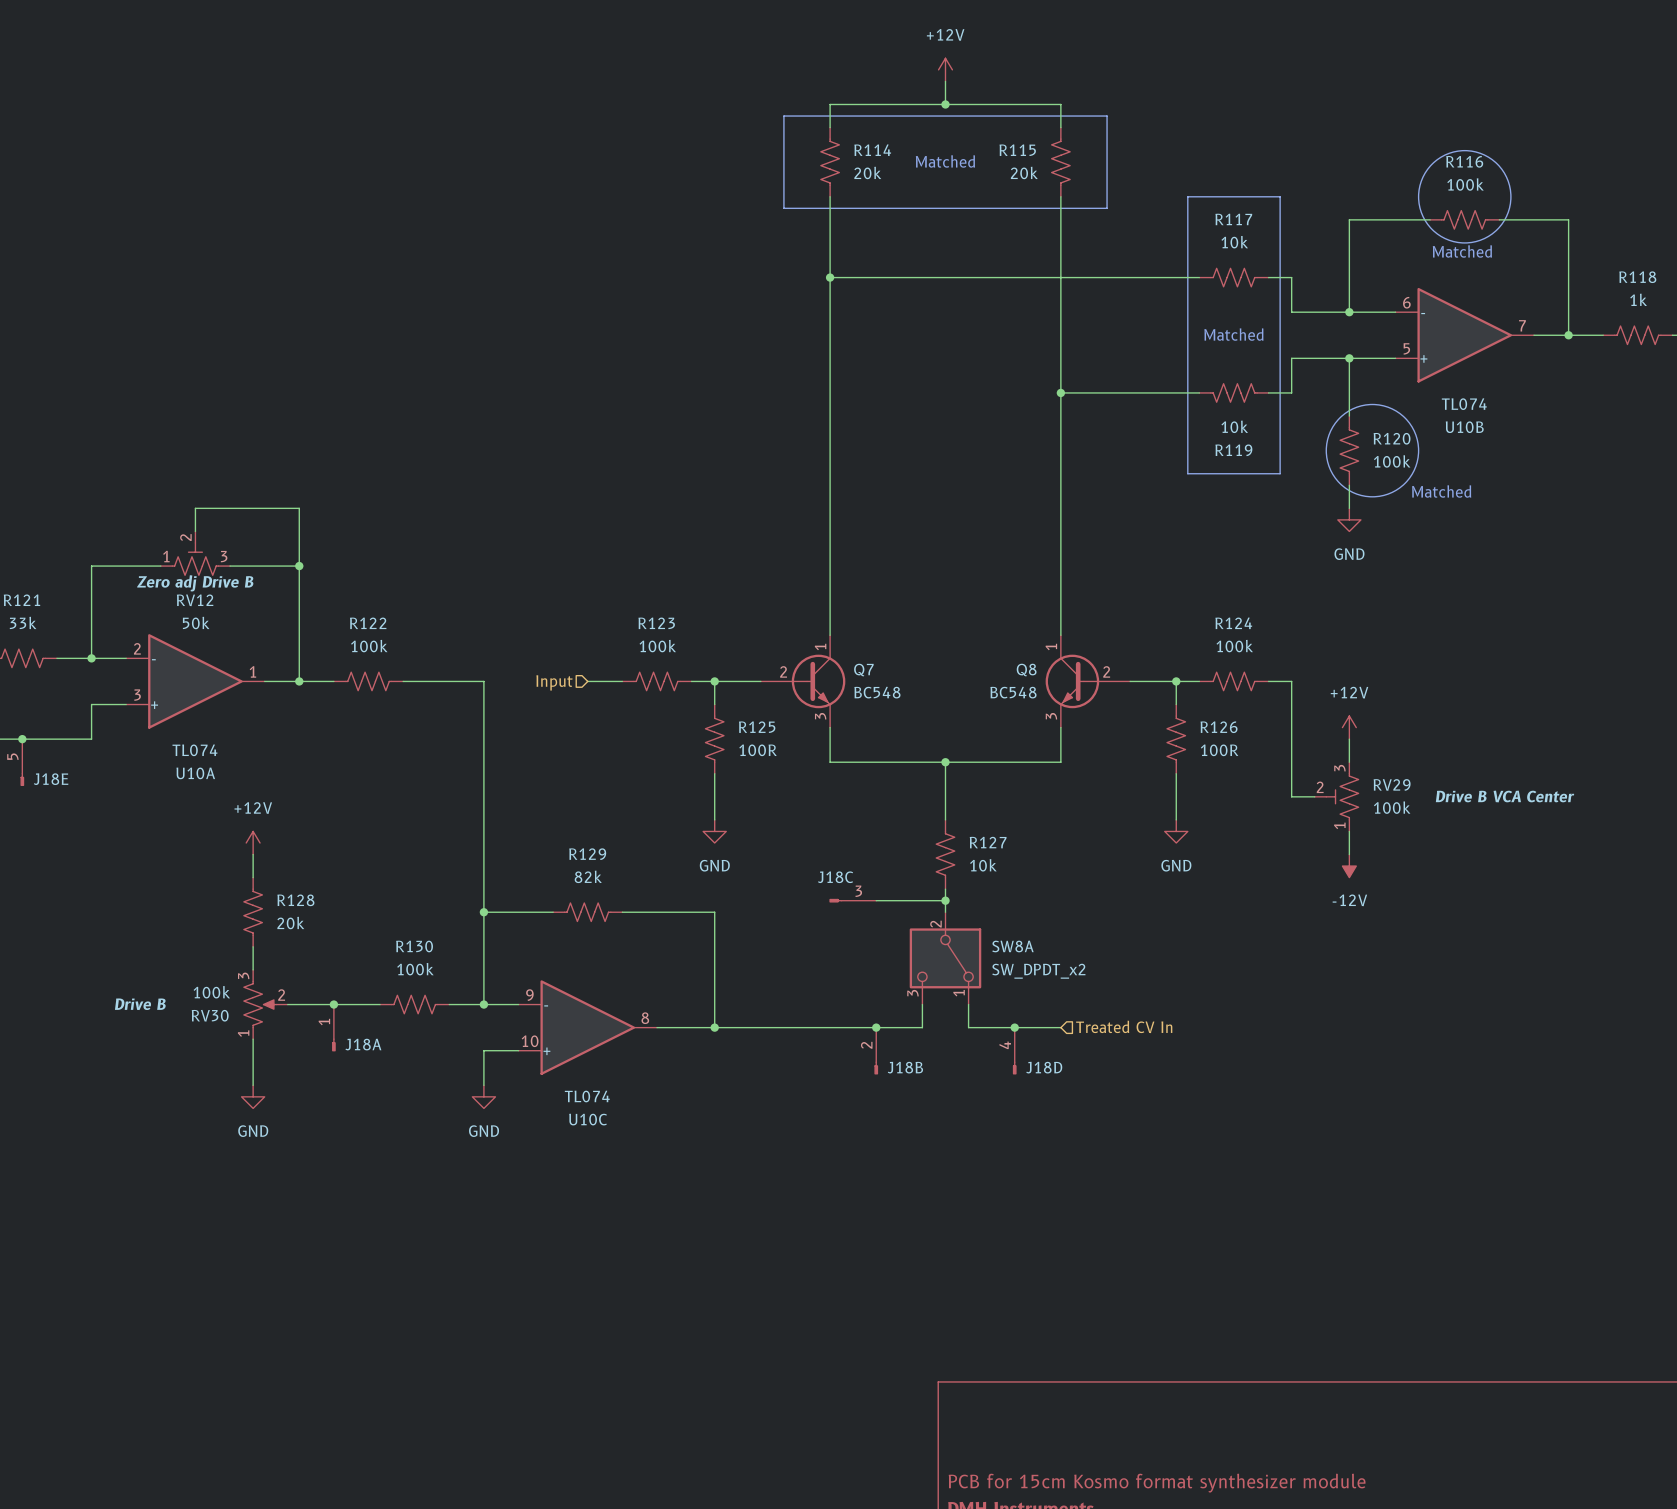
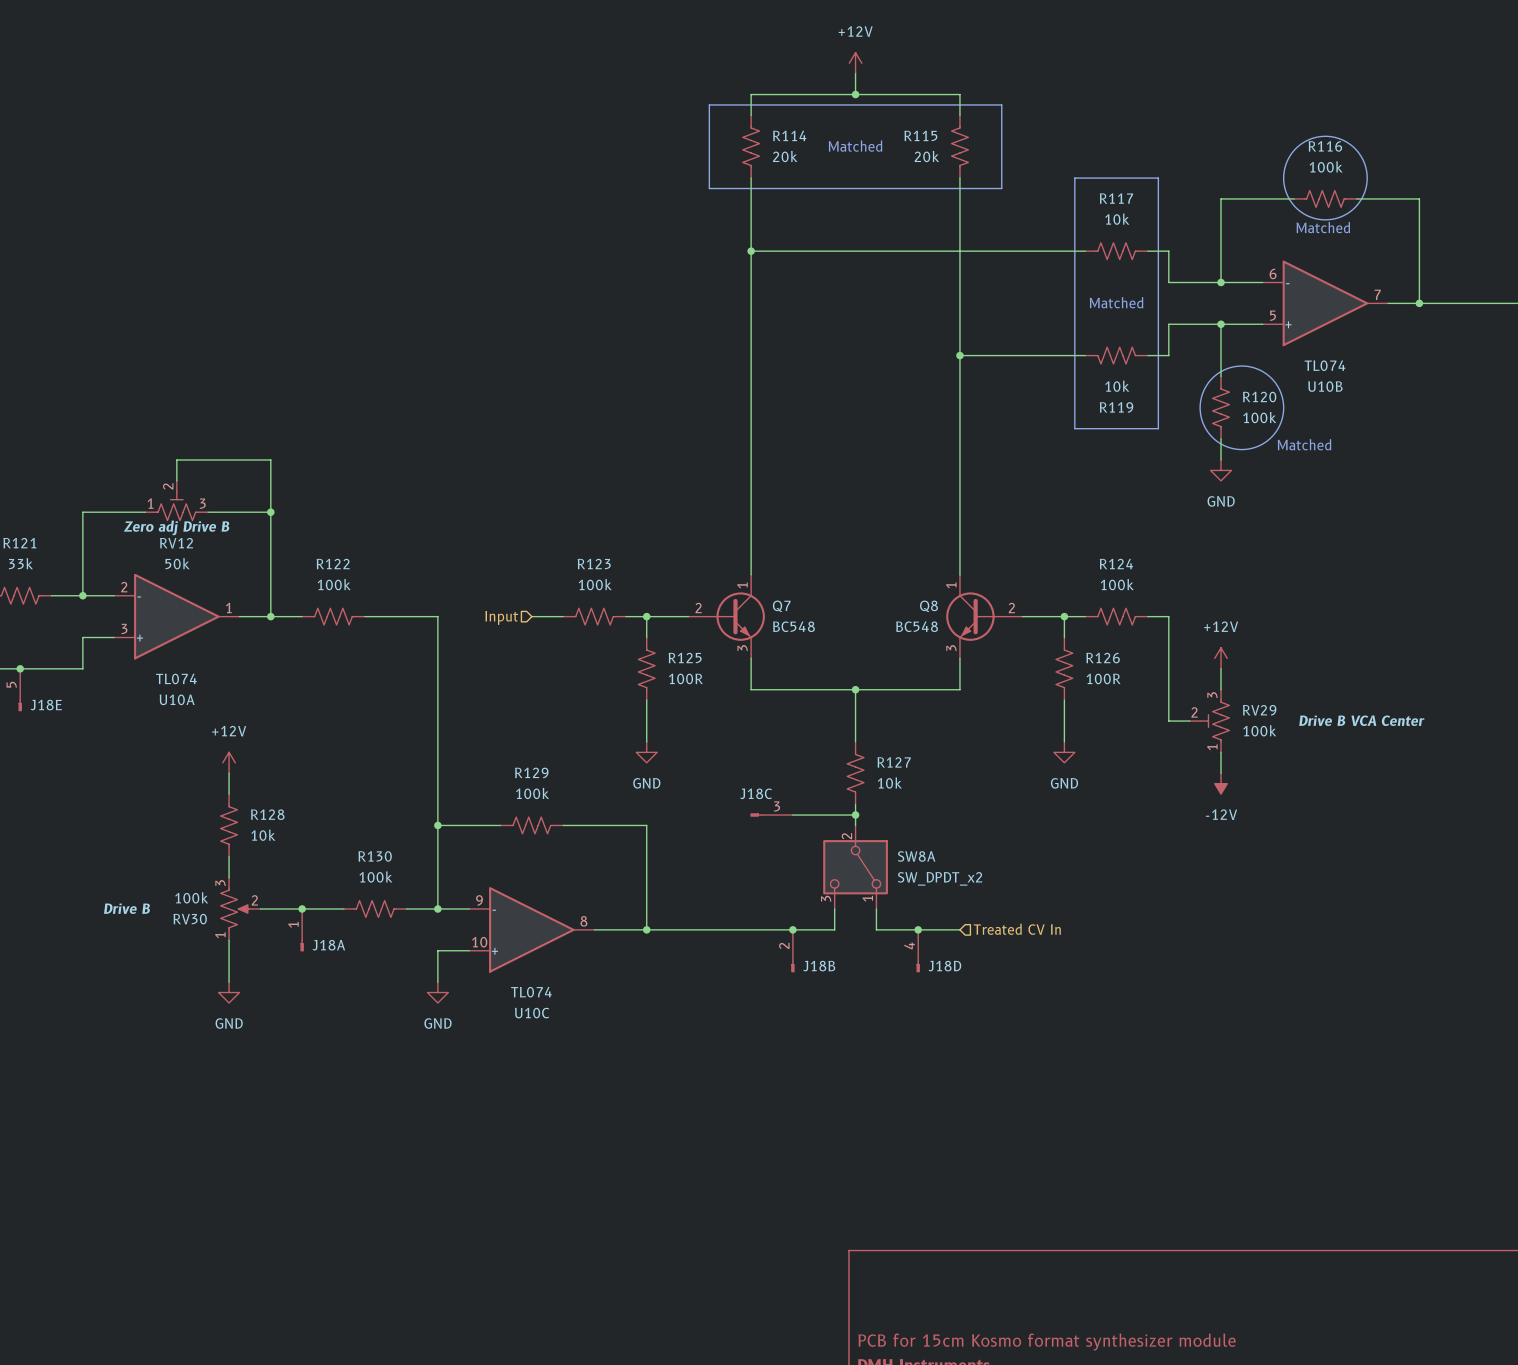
R118: 1k (1637, 335) -> none
Q7 symbol: [760, 635, 846, 728] -> [688, 574, 765, 659]
Q8 symbol: [1045, 635, 1131, 728] -> [946, 574, 1023, 659]
R129 value: 82k (588, 876) -> 100k (532, 793)
R128 value: 20k (290, 923) -> 10k (263, 835)

